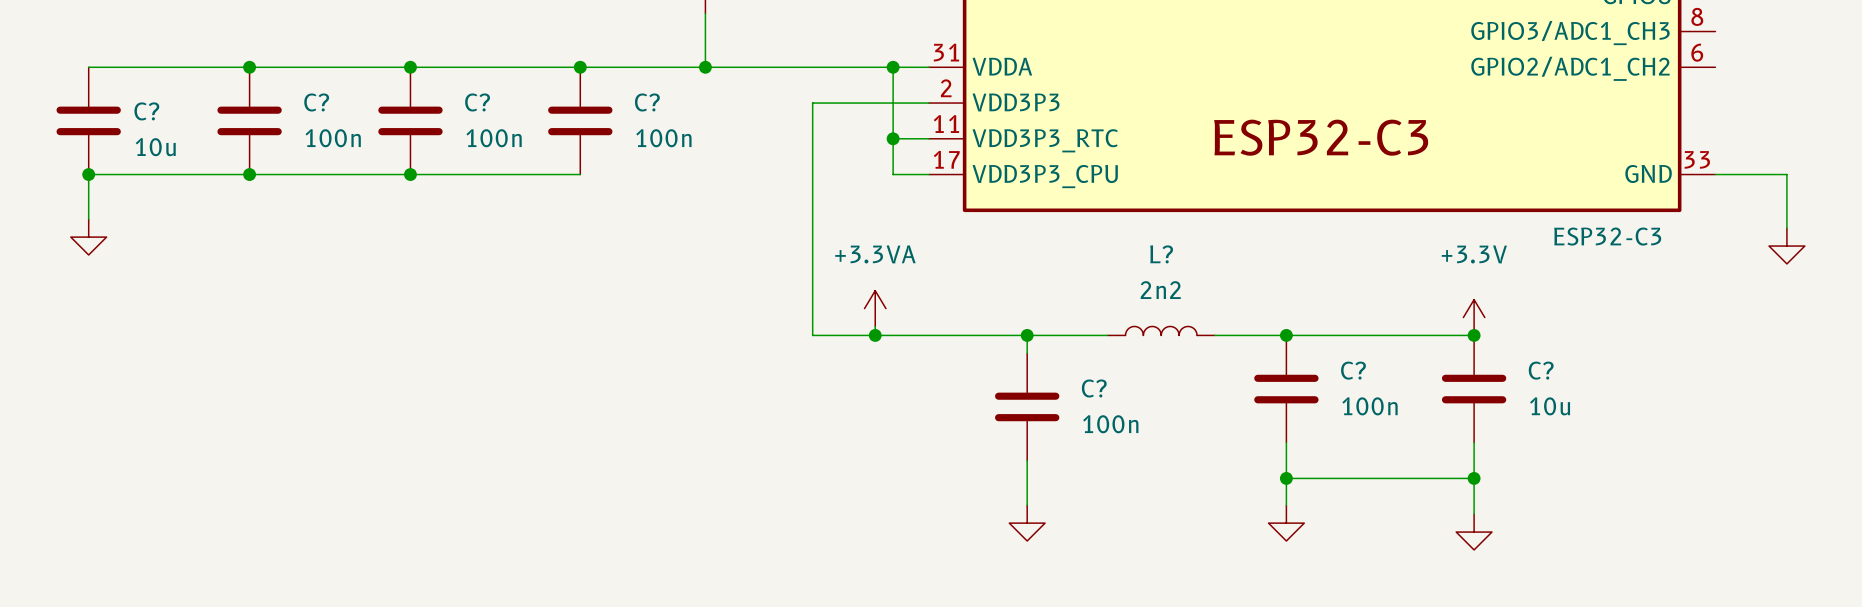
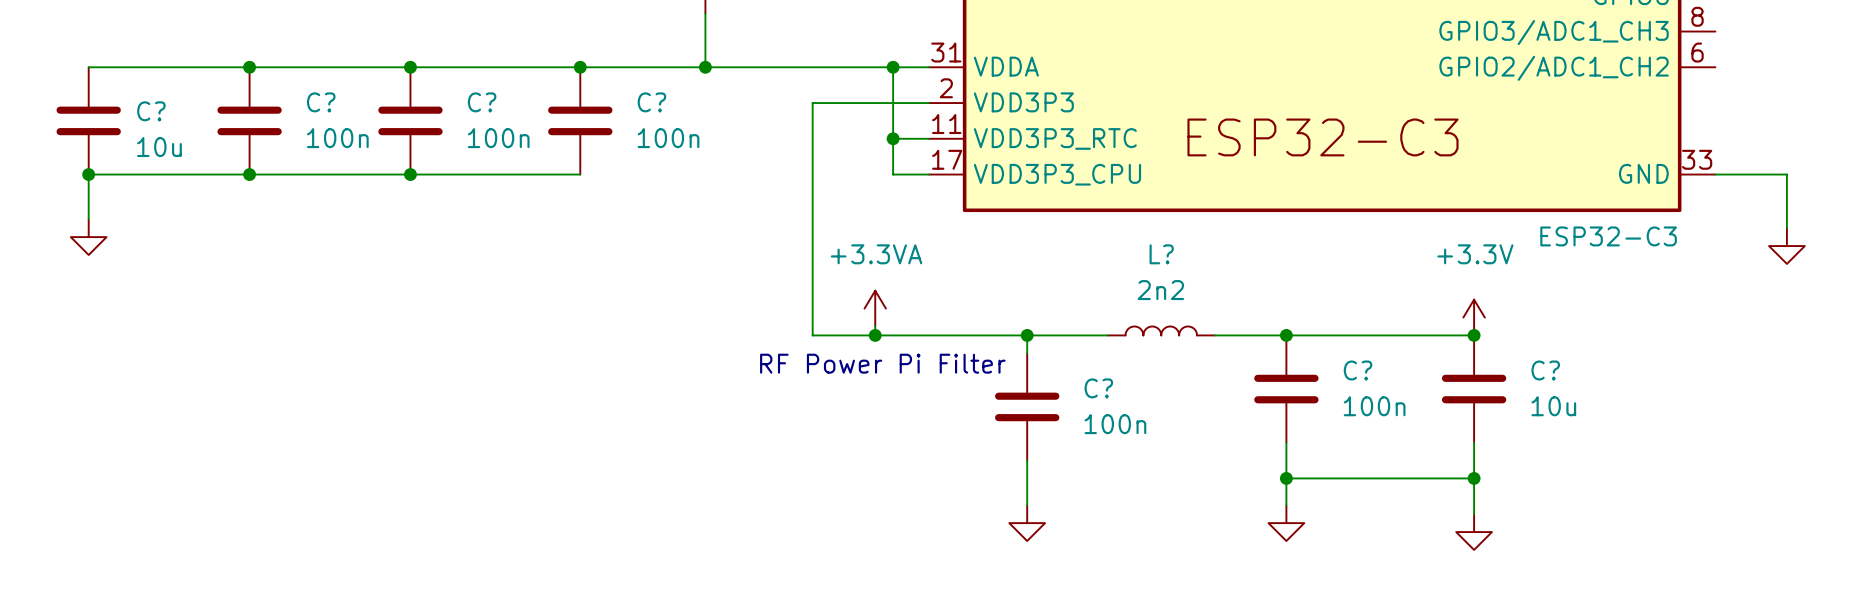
text: none -> RF Power Pi Filter (882, 363)

